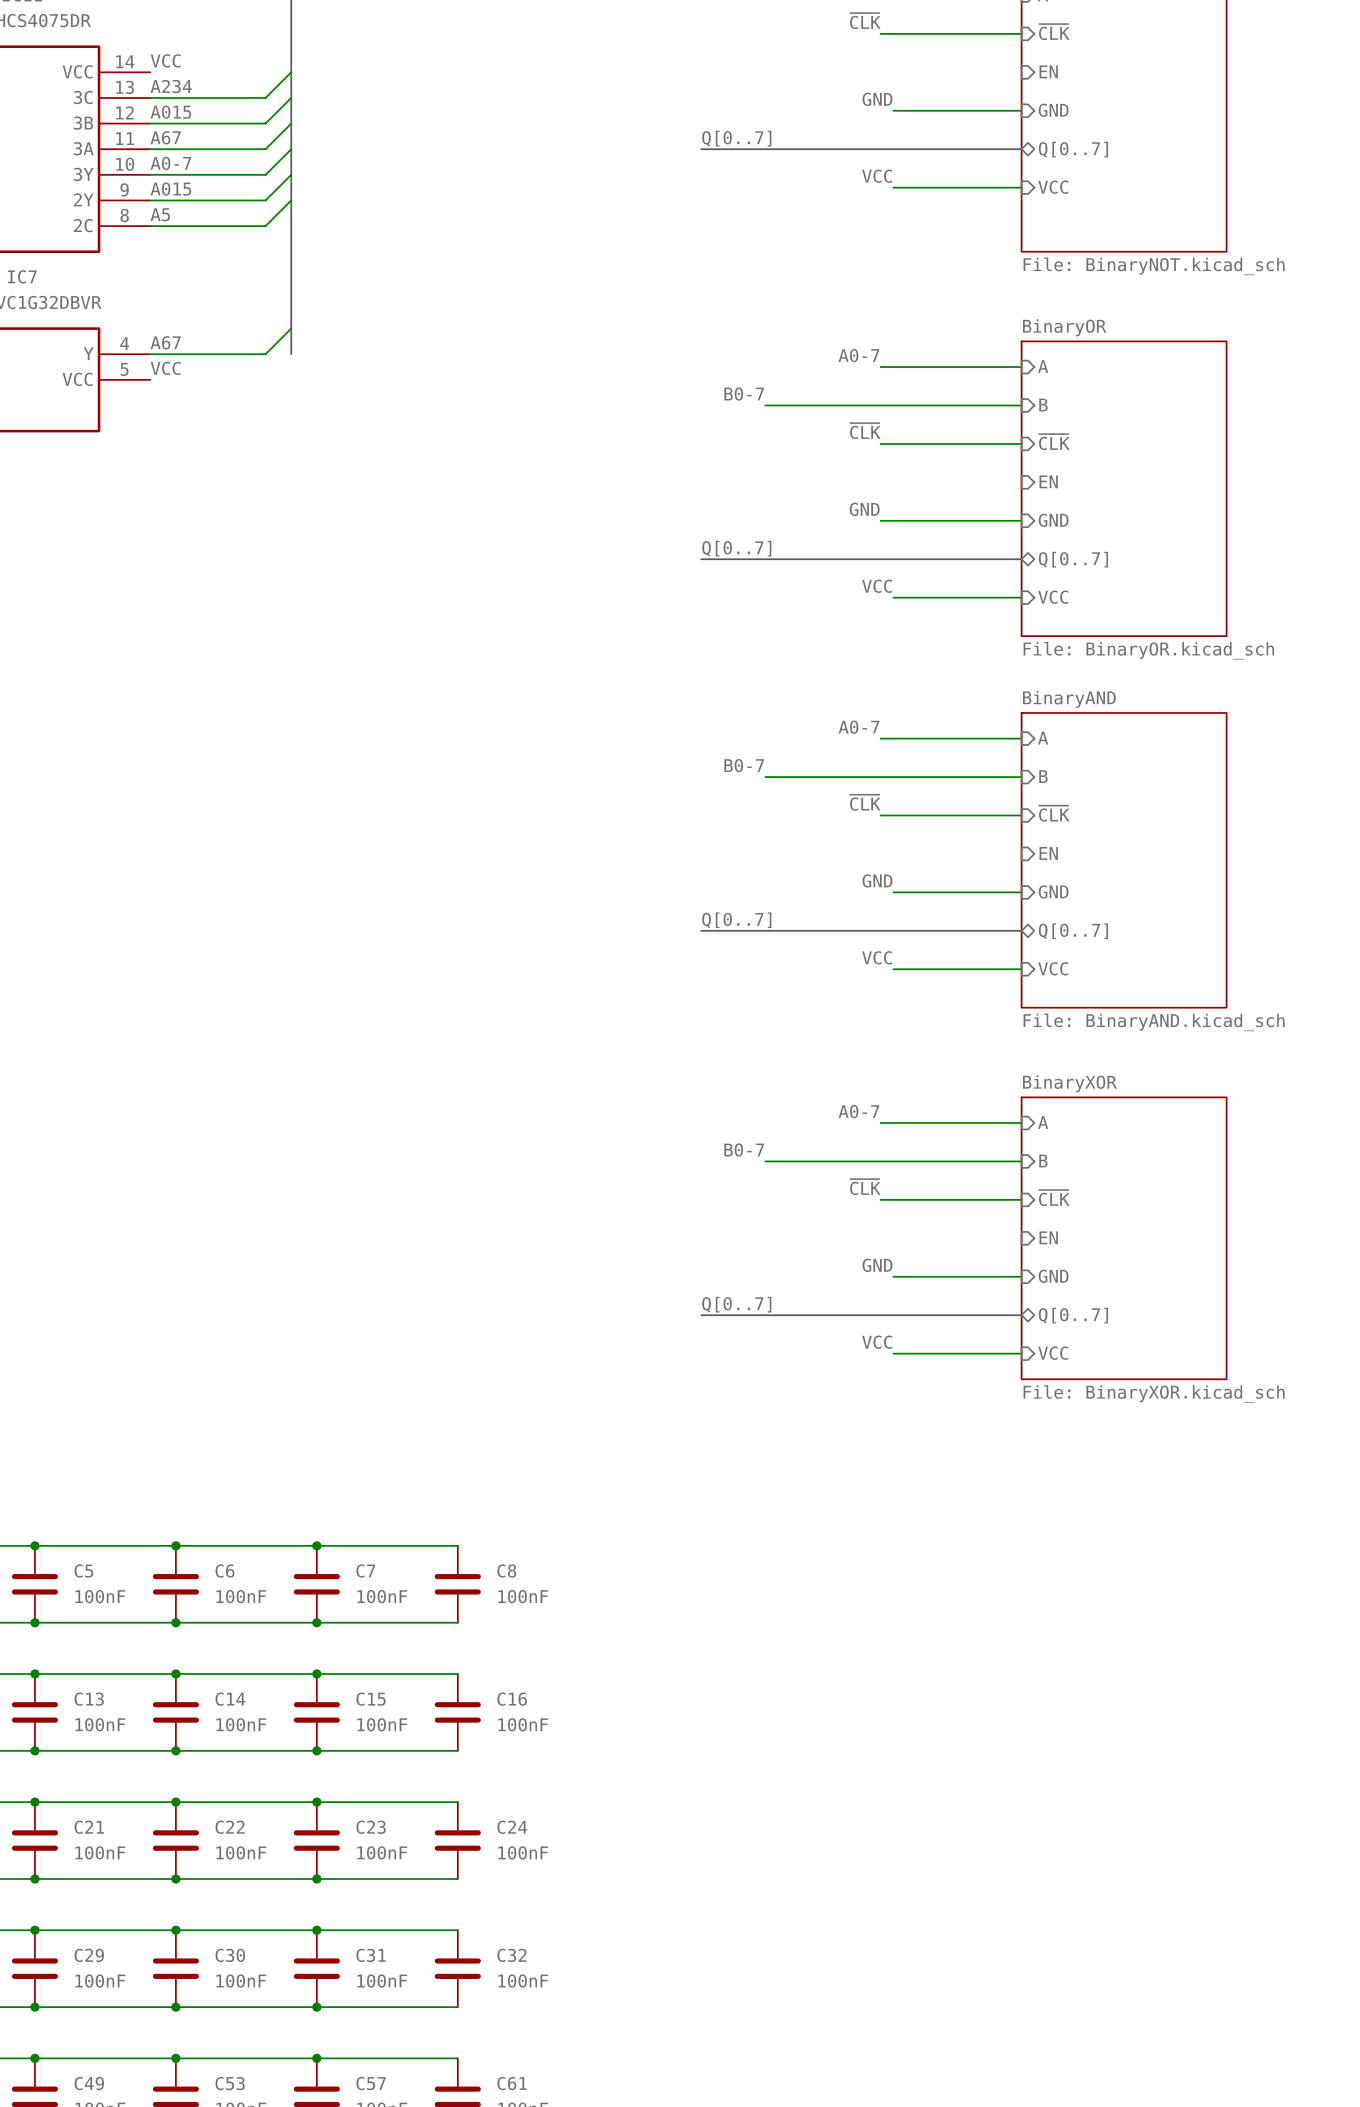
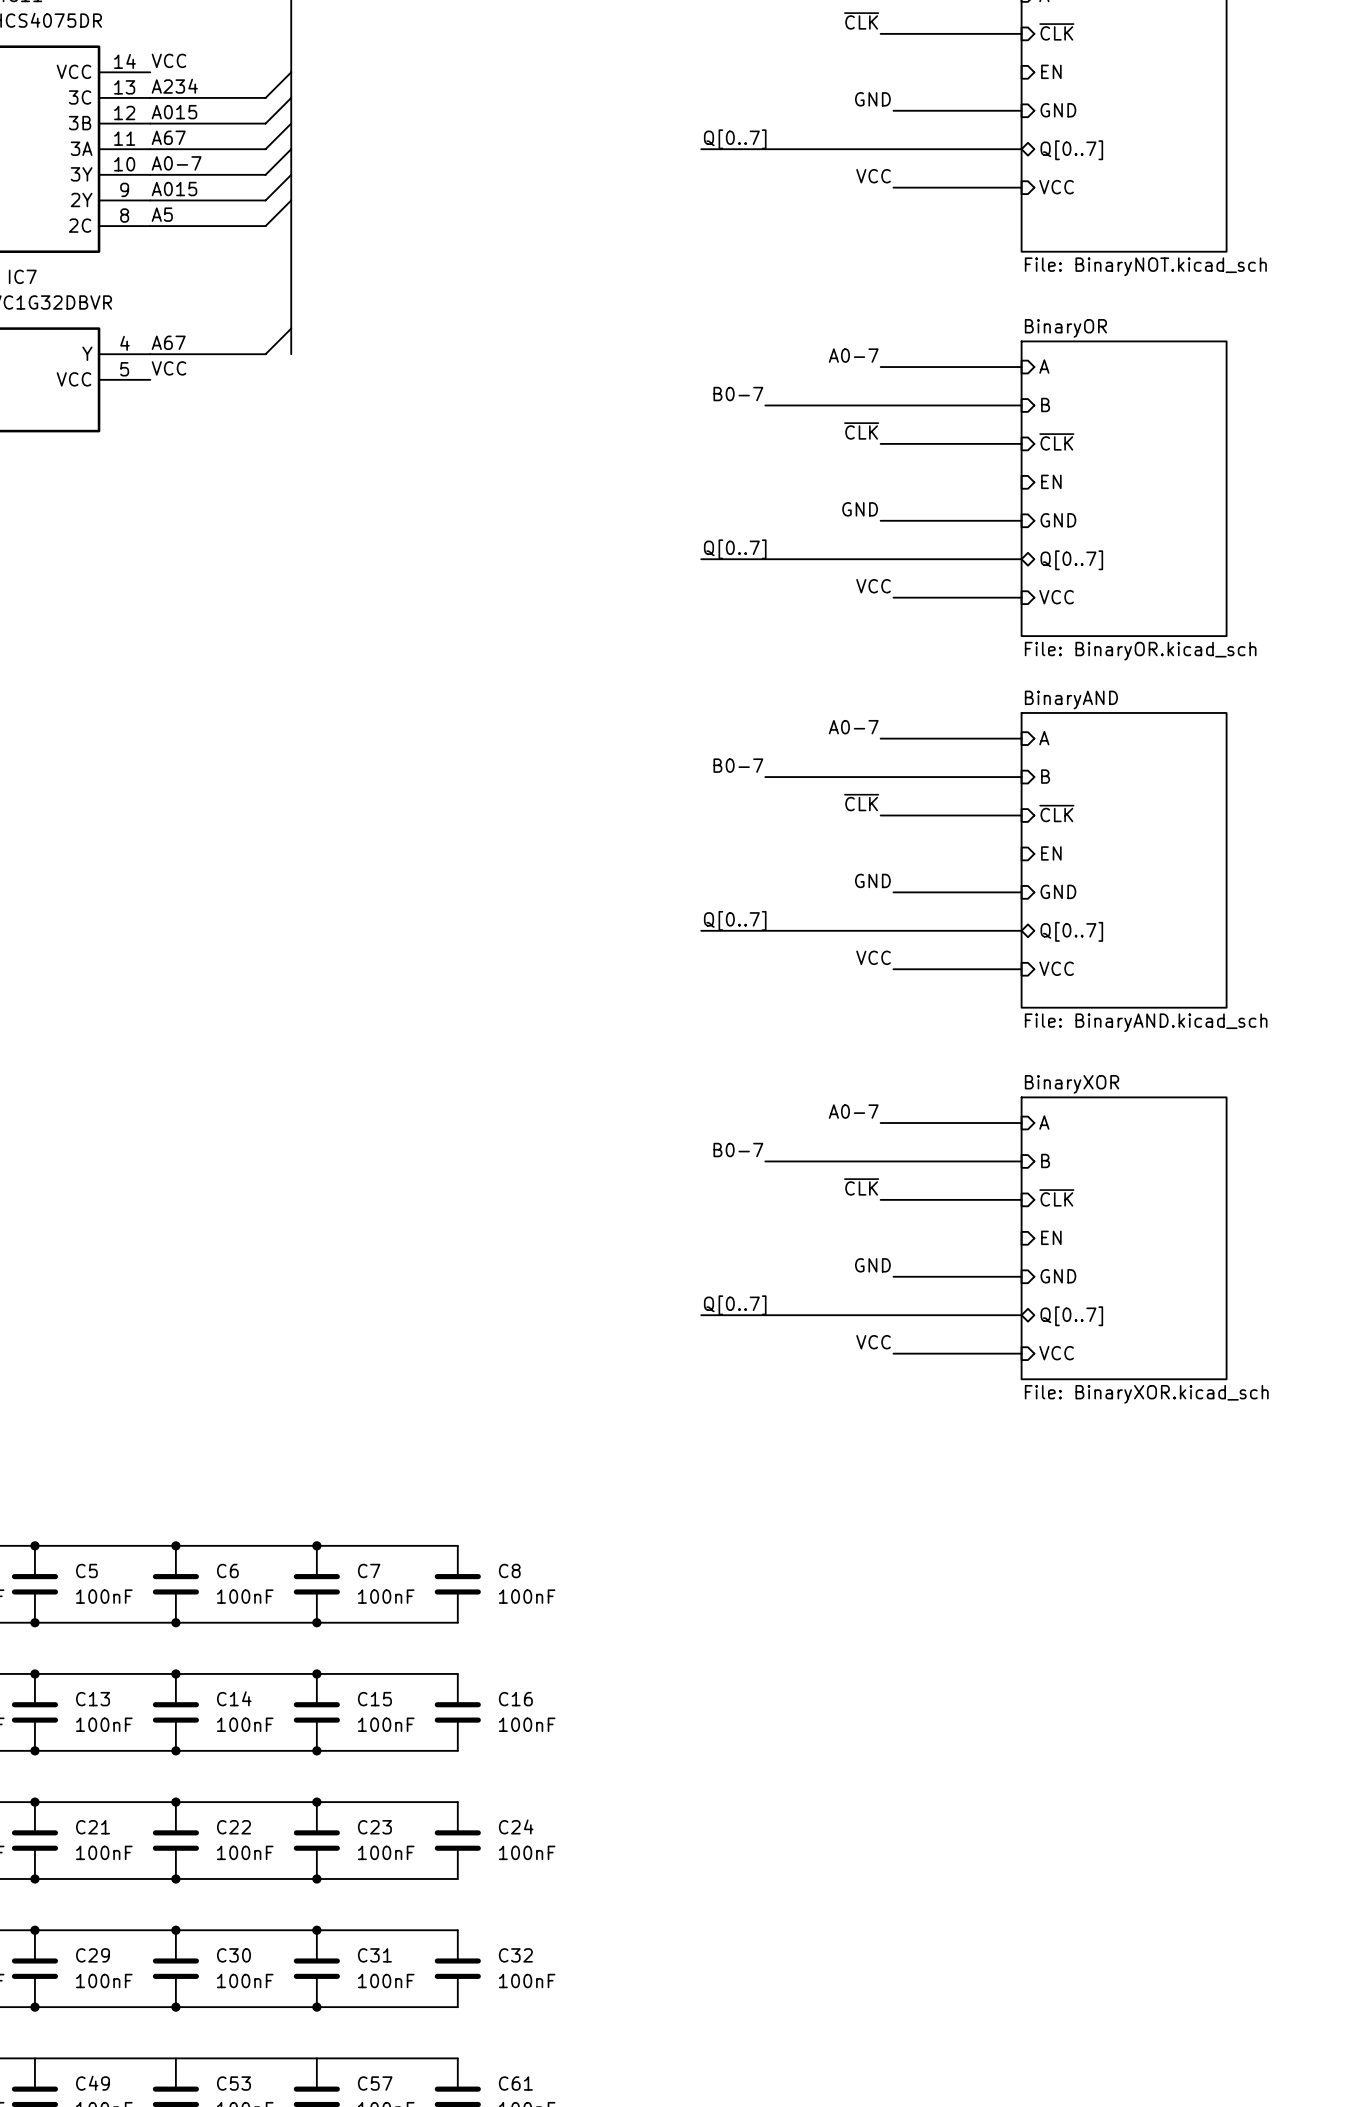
junction: (34, 2058) -> none
junction: (175, 2058) -> none
junction: (316, 2058) -> none

